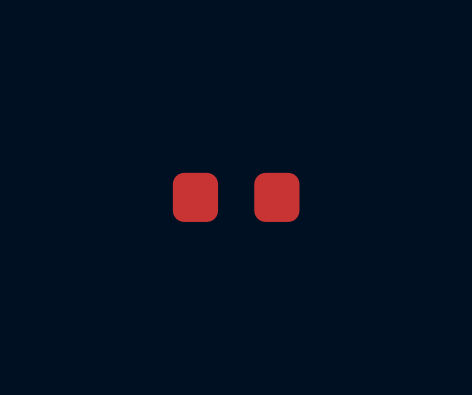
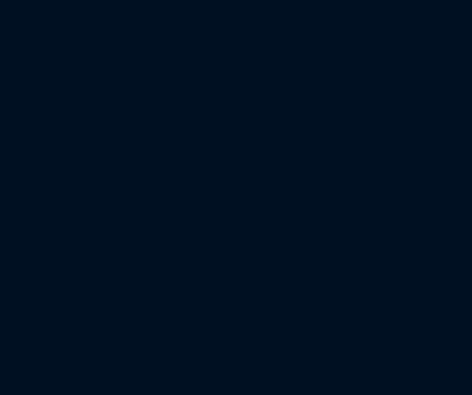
part: (236, 197) -> none

